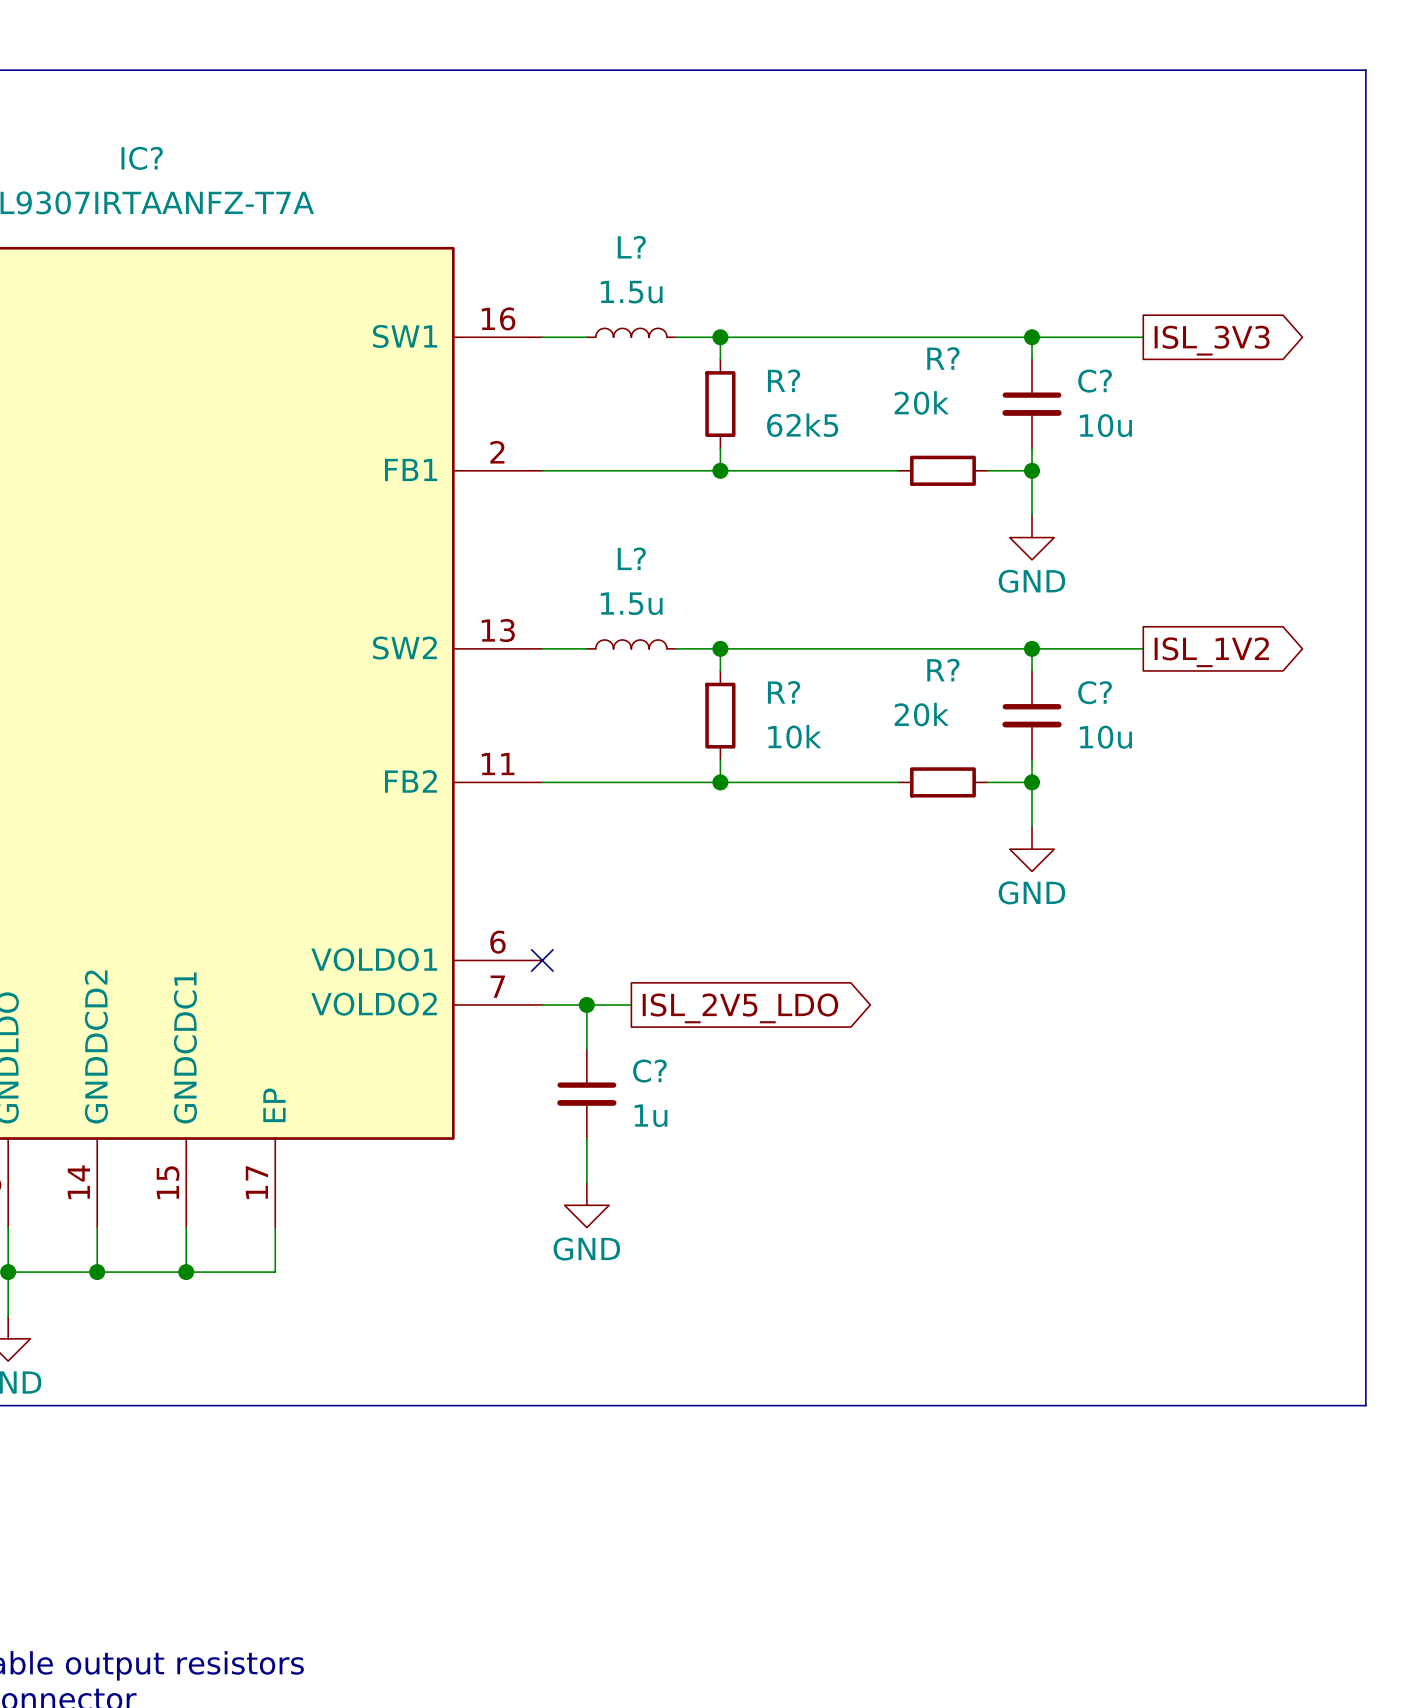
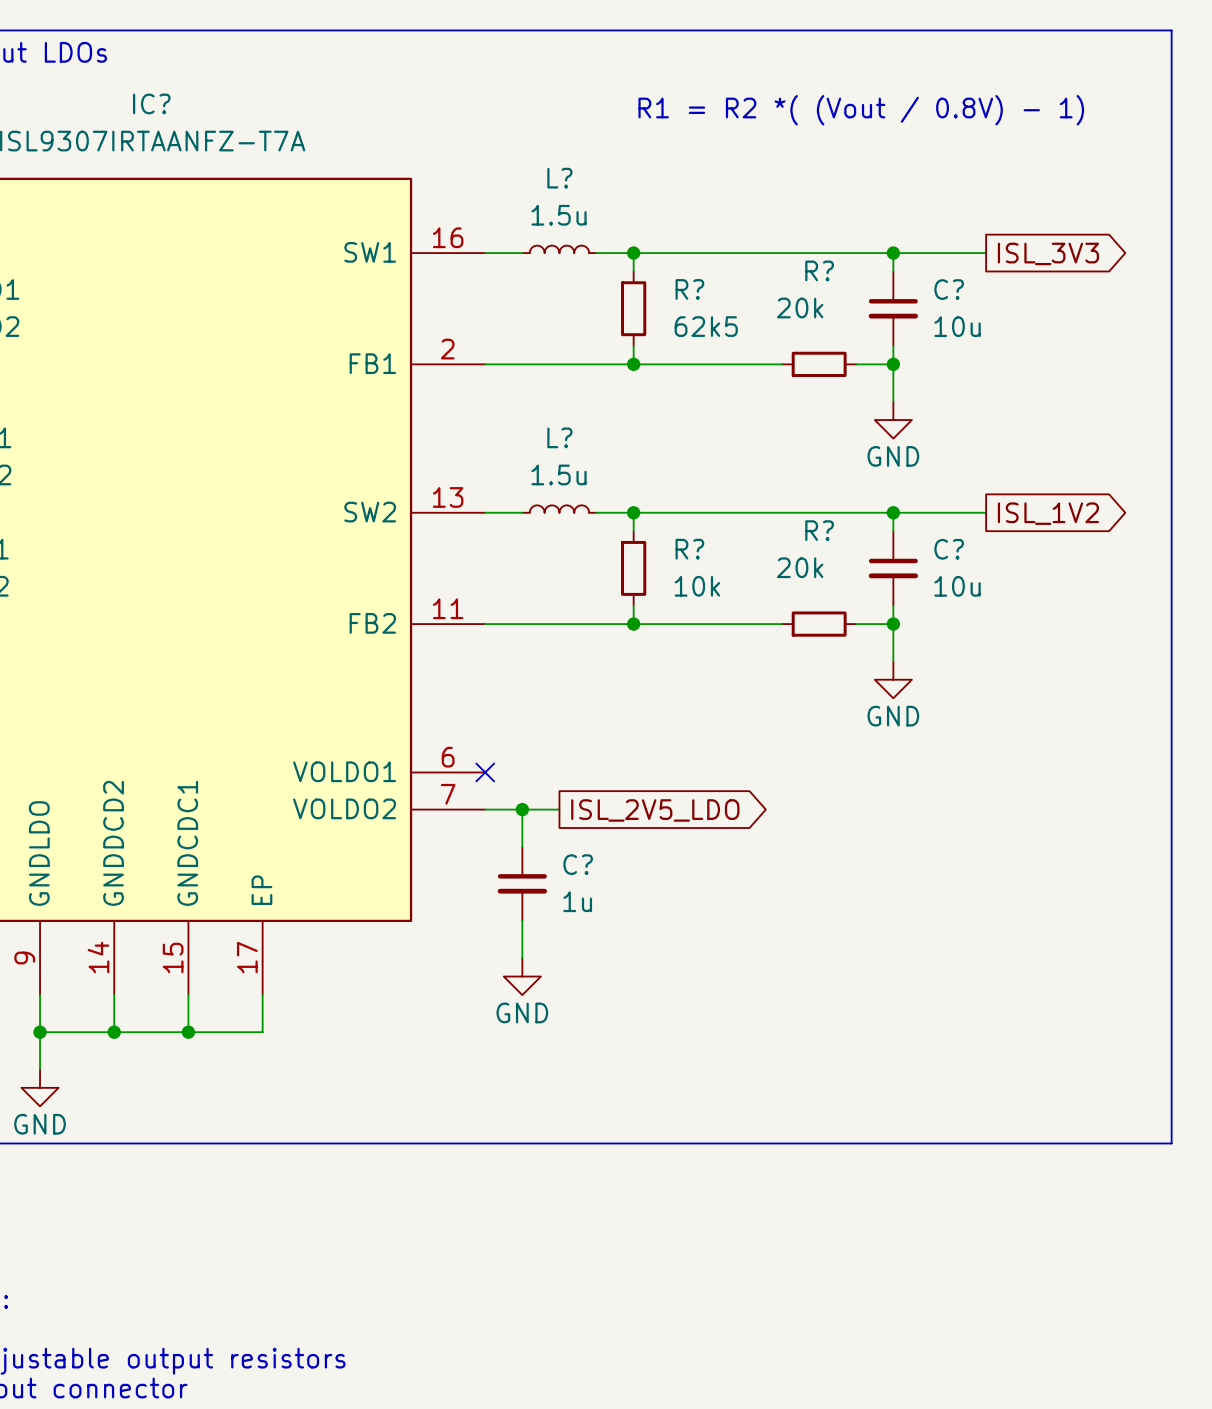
text: none -> R1 = R2 *( (Vout / 0.8V) - 1) (861, 110)

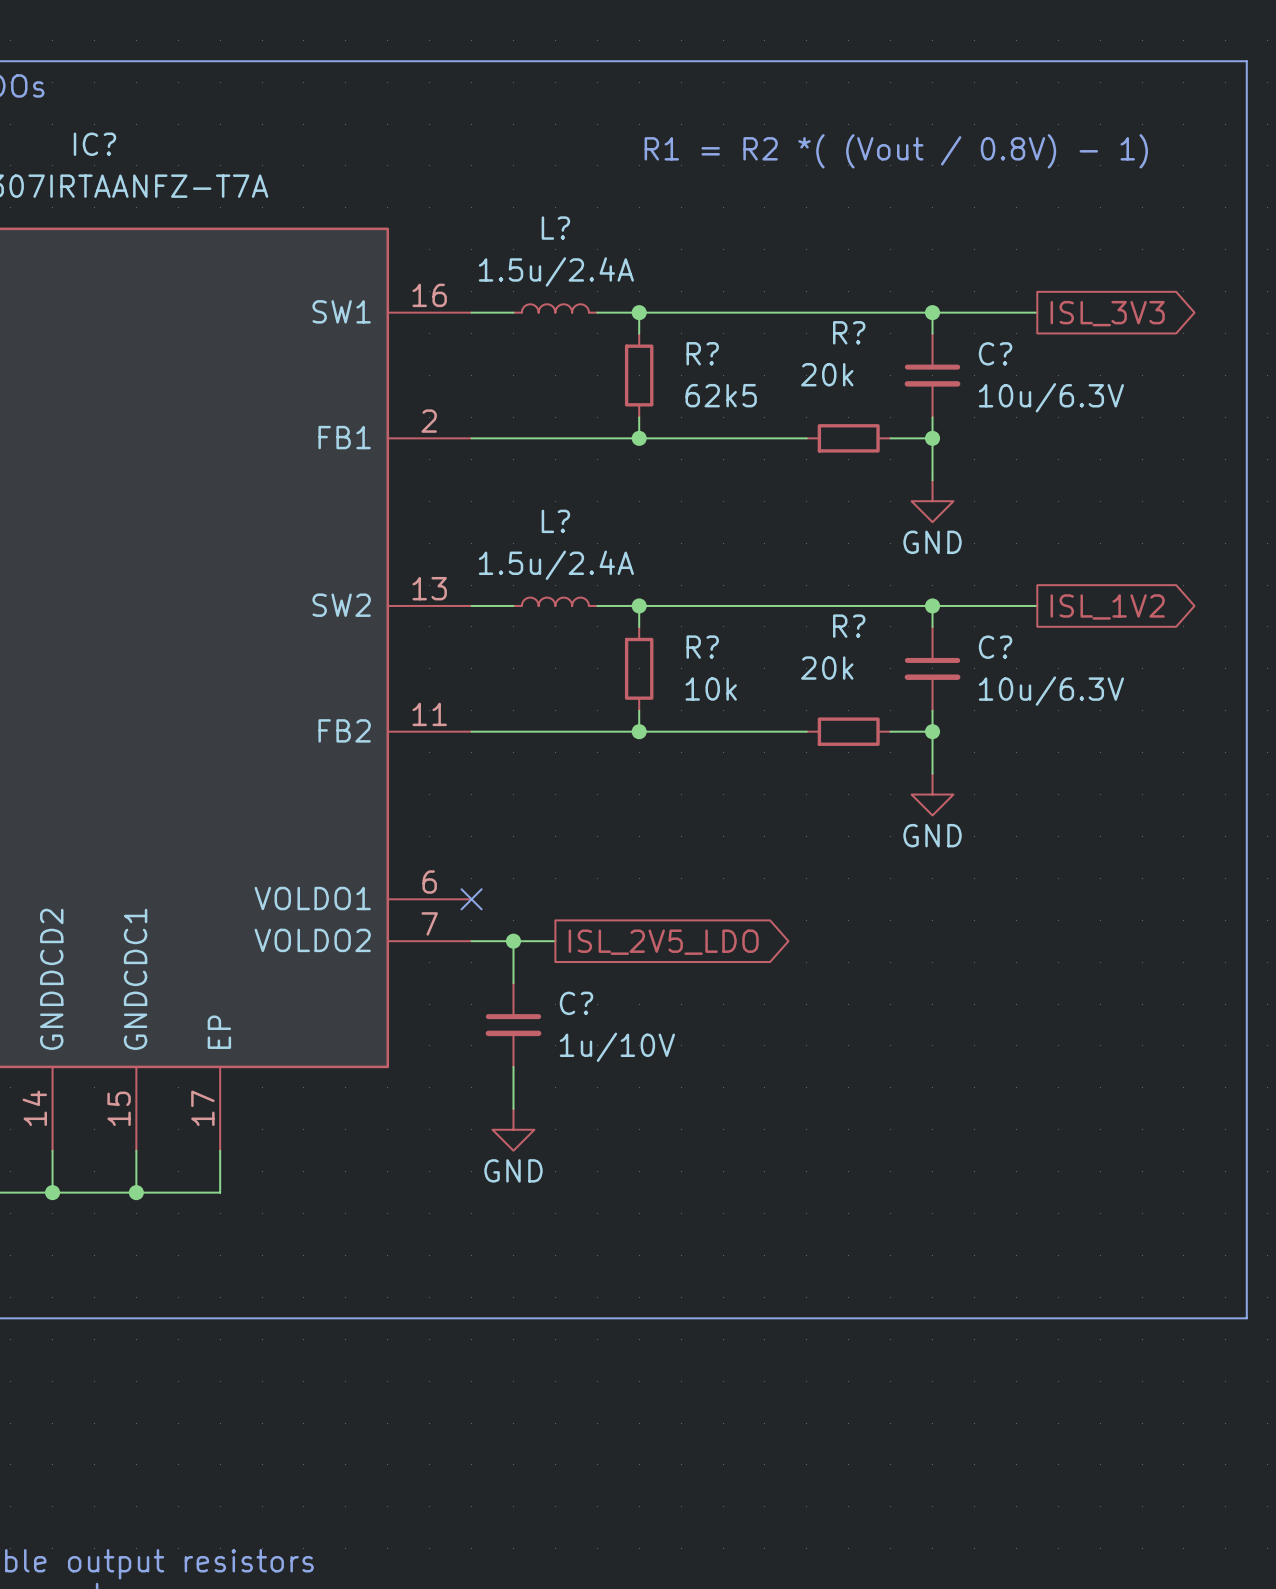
L? value: 1.5u (559, 215) -> 1.5u/2.4A (556, 271)
C? value: 10u (957, 326) -> 10u/6.3V (1051, 397)
L? value: 1.5u (559, 474) -> 1.5u/2.4A (556, 565)
C? value: 10u (957, 586) -> 10u/6.3V (1051, 691)
C? value: 1u (577, 901) -> 1u/10V (617, 1047)

